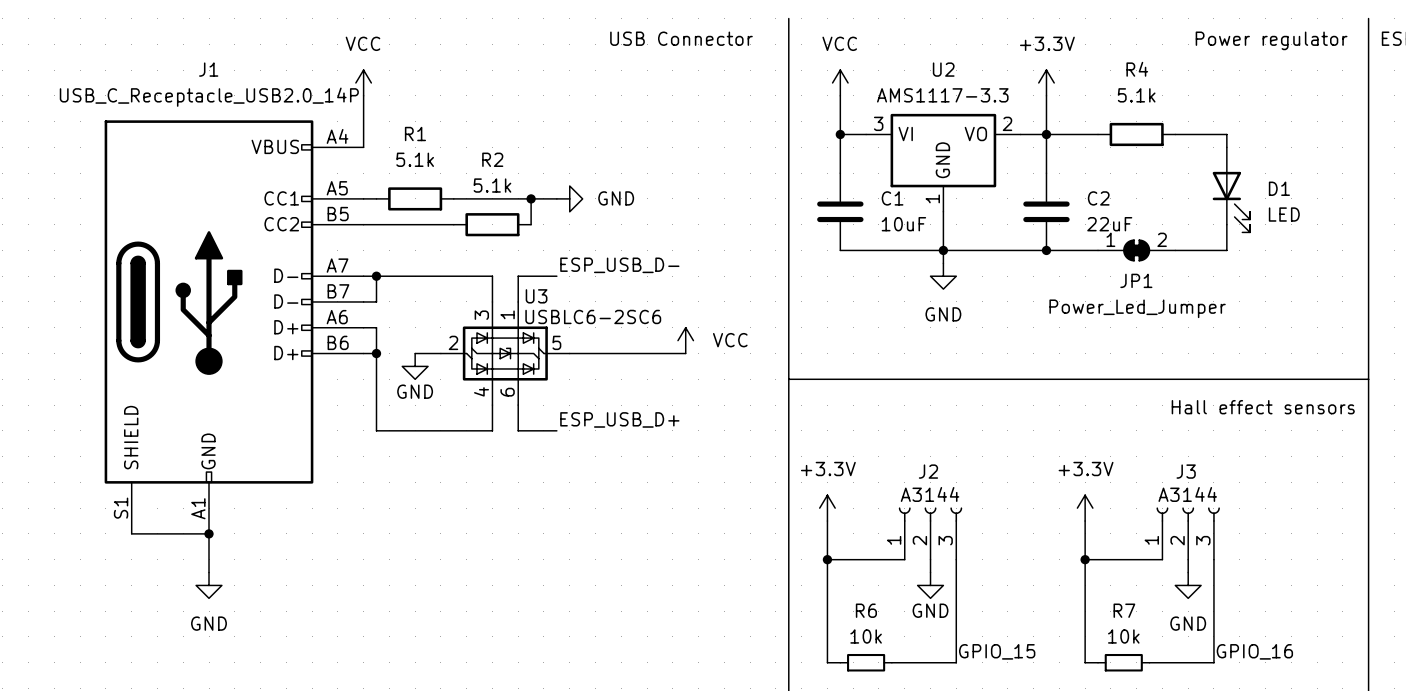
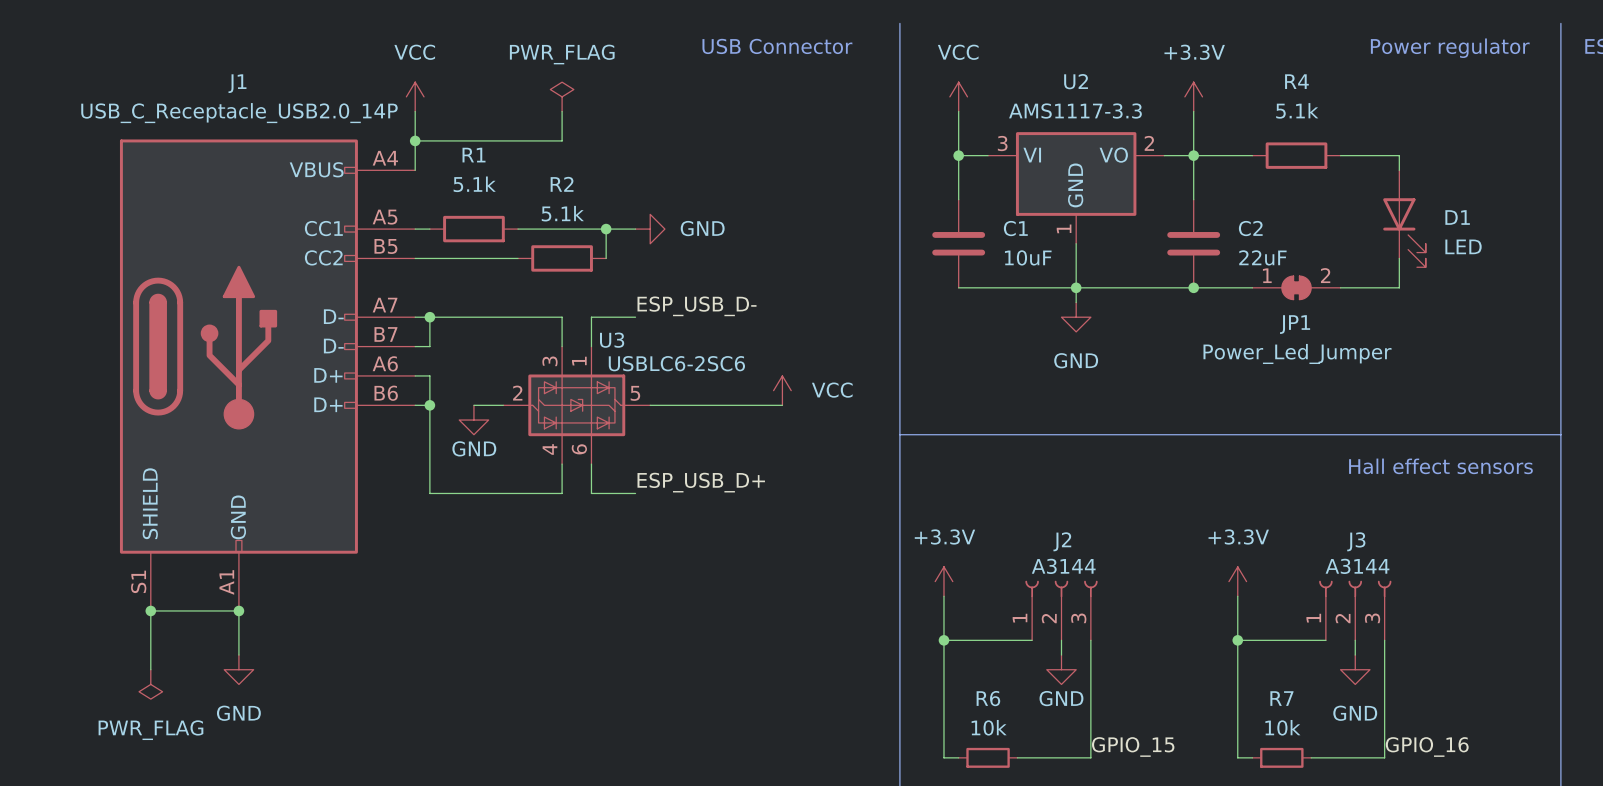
power symbol: none -> PWR_FLAG (562, 96)
wire: none -> (562, 111) (562, 140) (415, 140)
junction: none -> (415, 140)
wire: none -> (150, 610) (150, 669)
junction: none -> (150, 610)
power symbol: none -> PWR_FLAG (150, 684)

